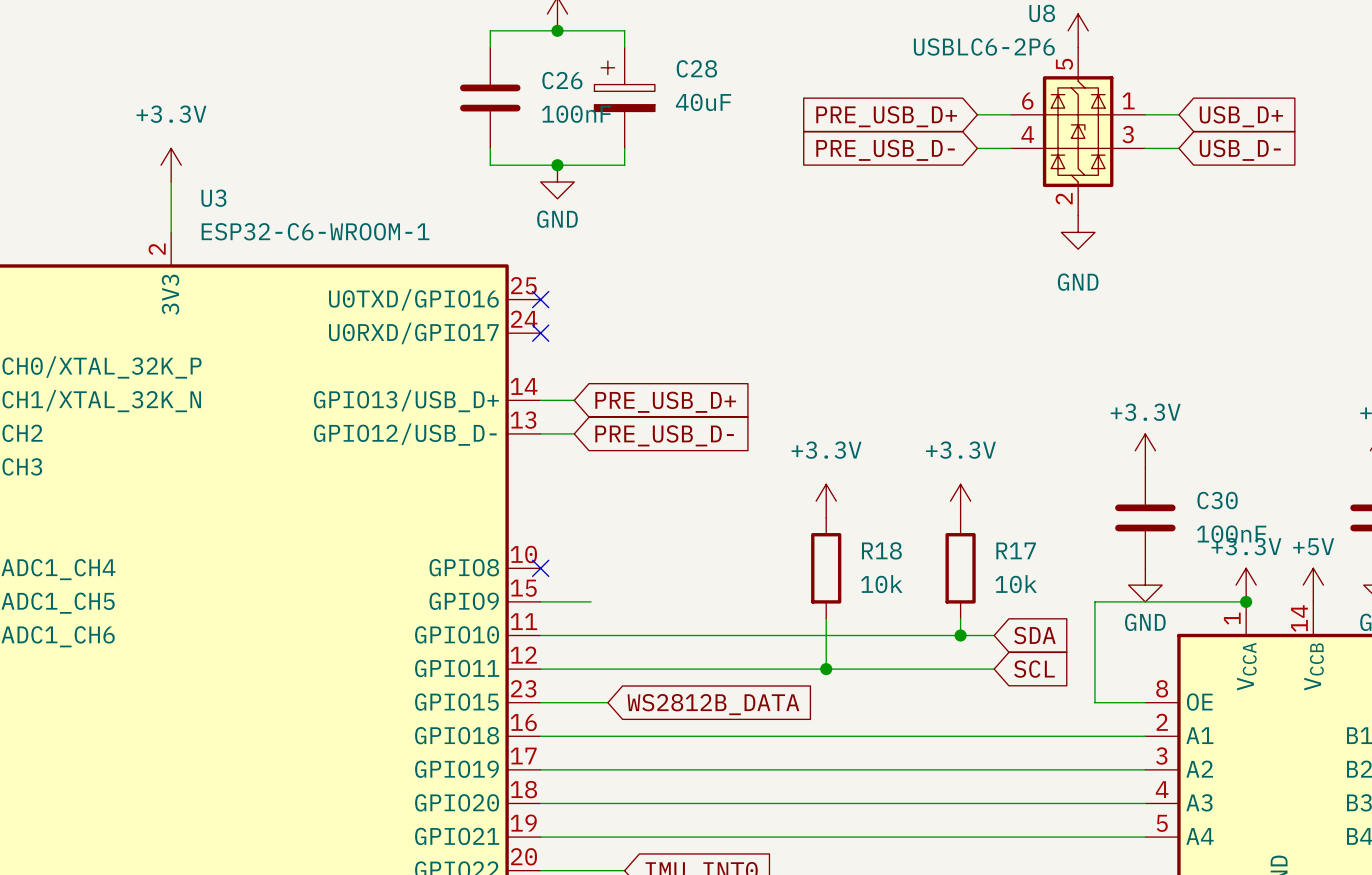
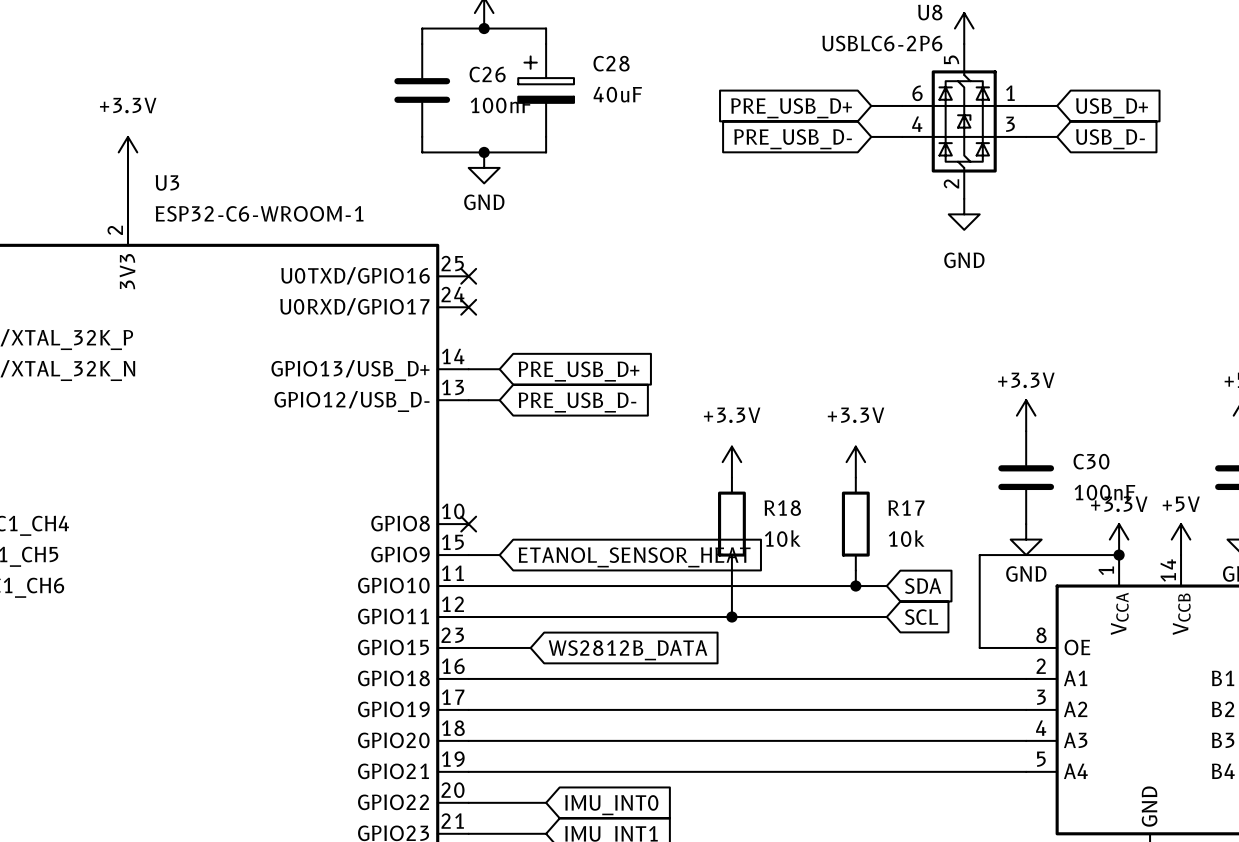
wire: (574, 601) (591, 601) -> none
global label: none -> ETANOL_SENSOR_HEAT (634, 557)

